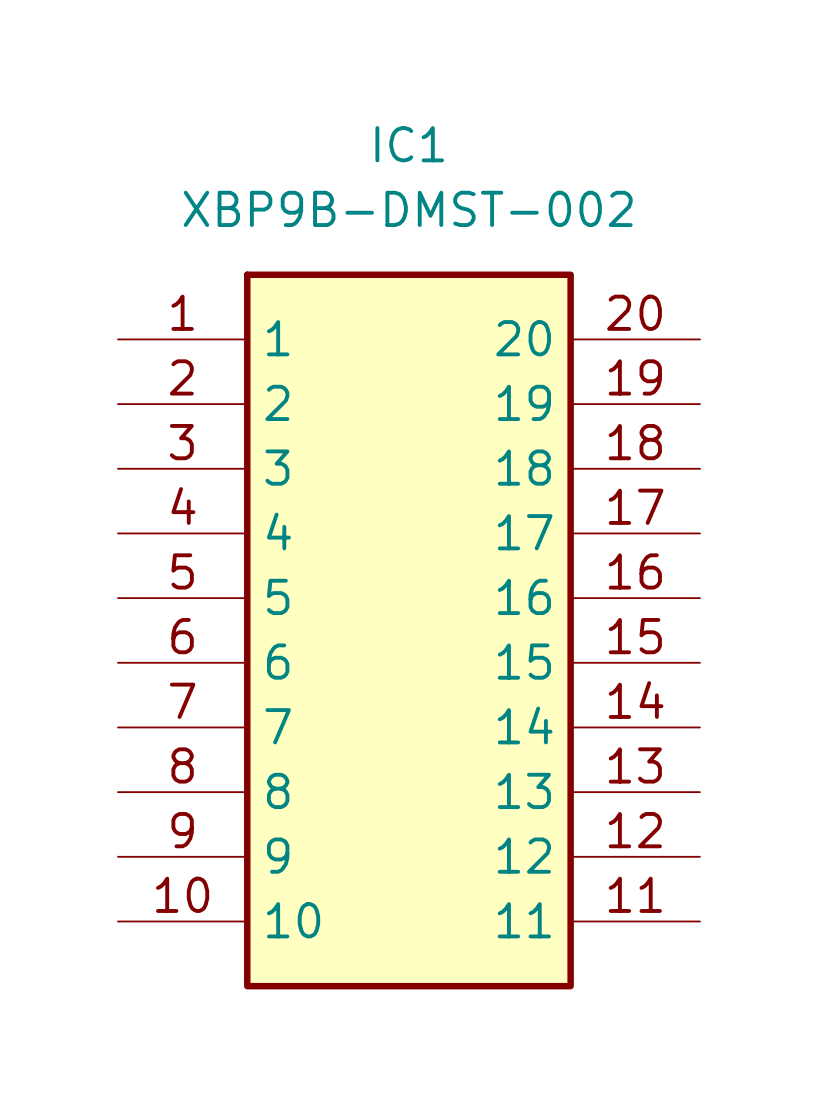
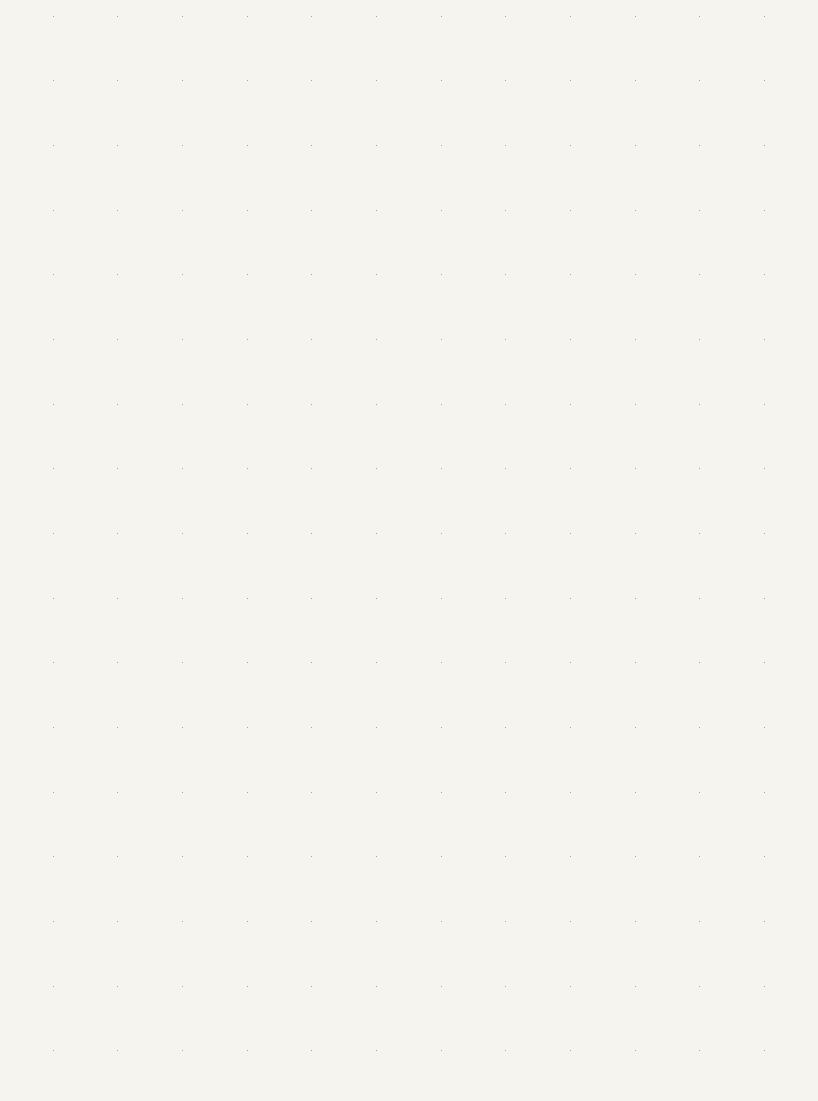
IC1: XBP9B-DMST-002 (408, 630) -> none

